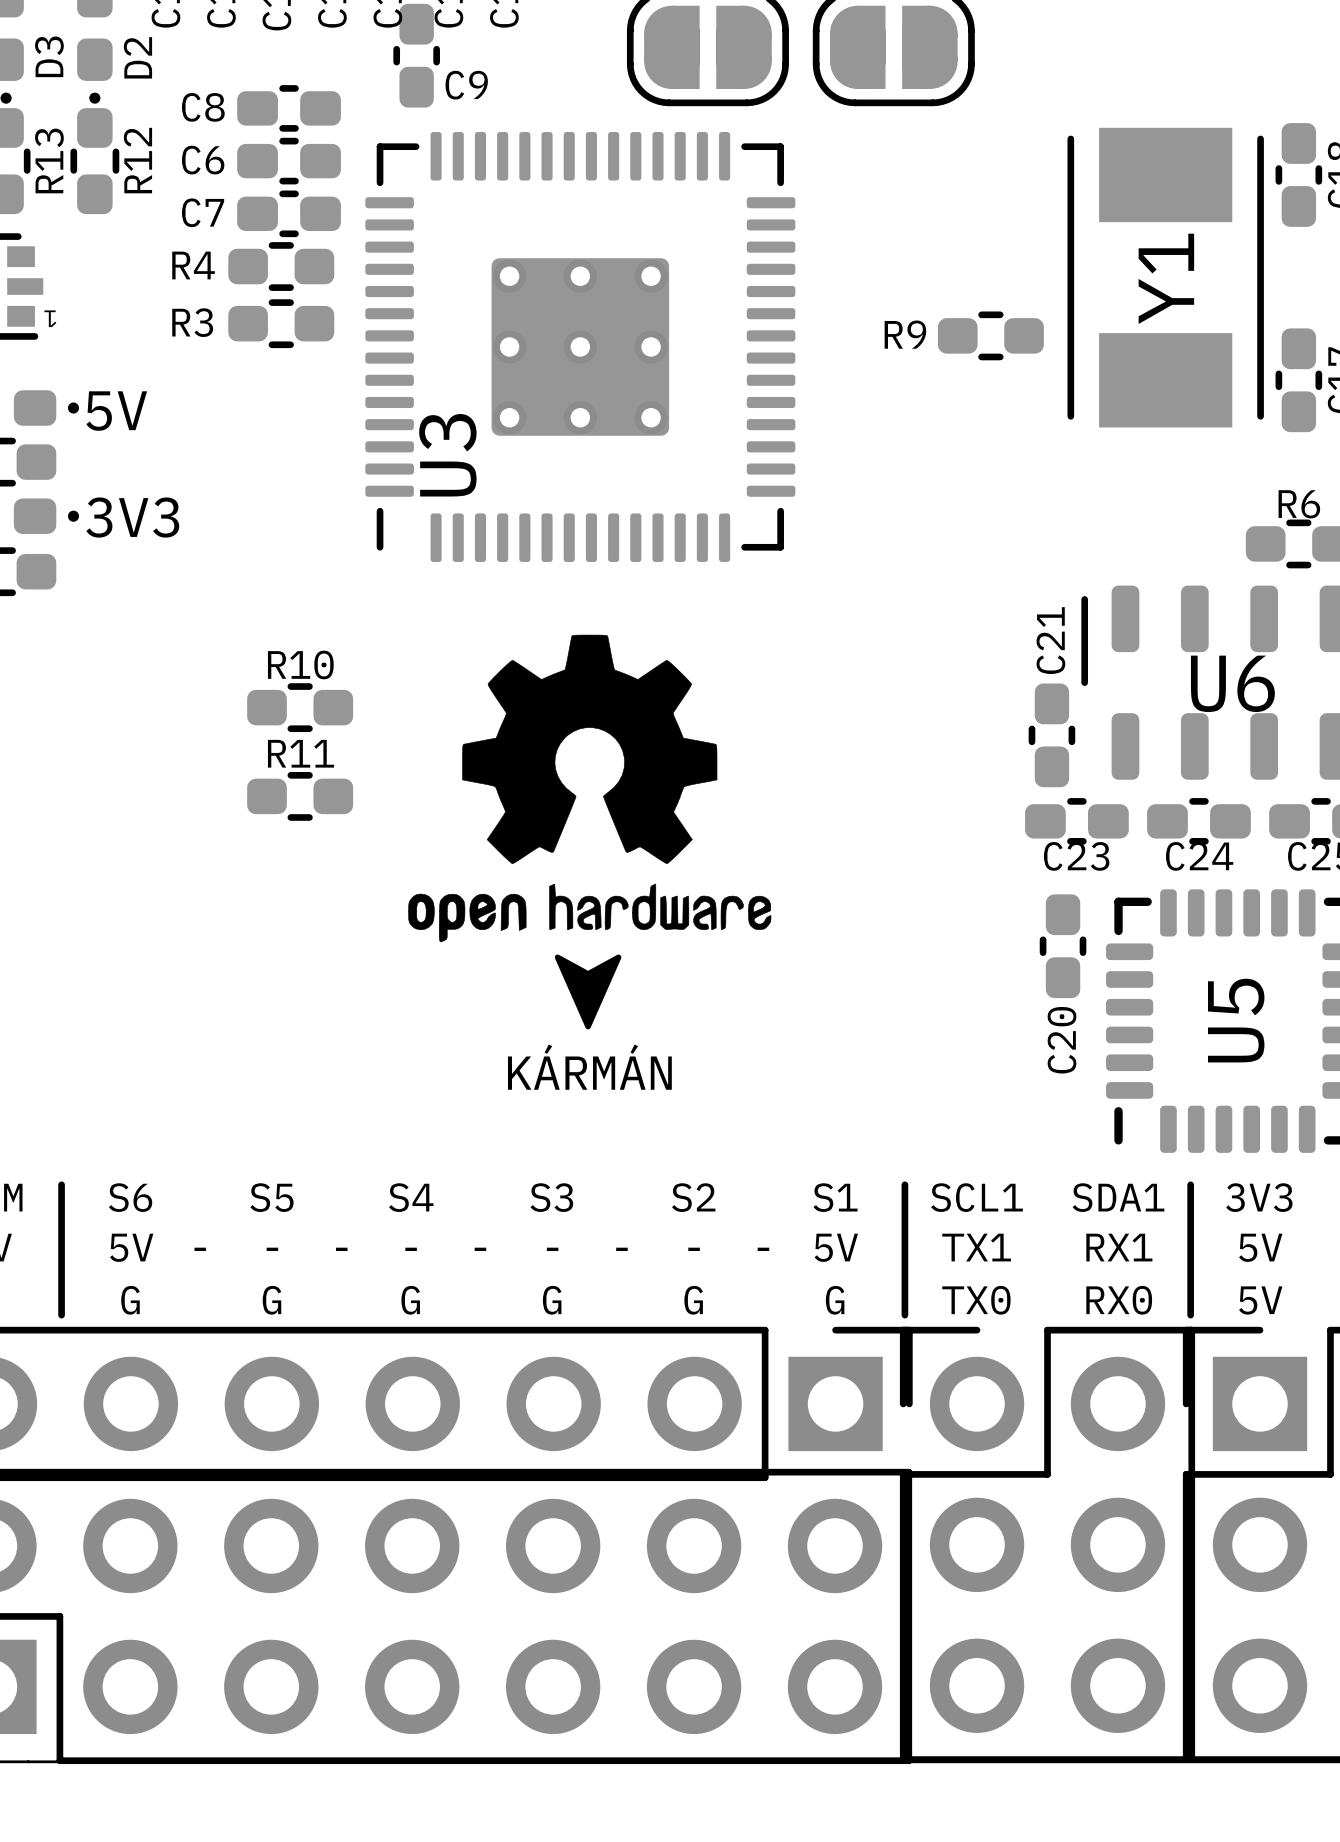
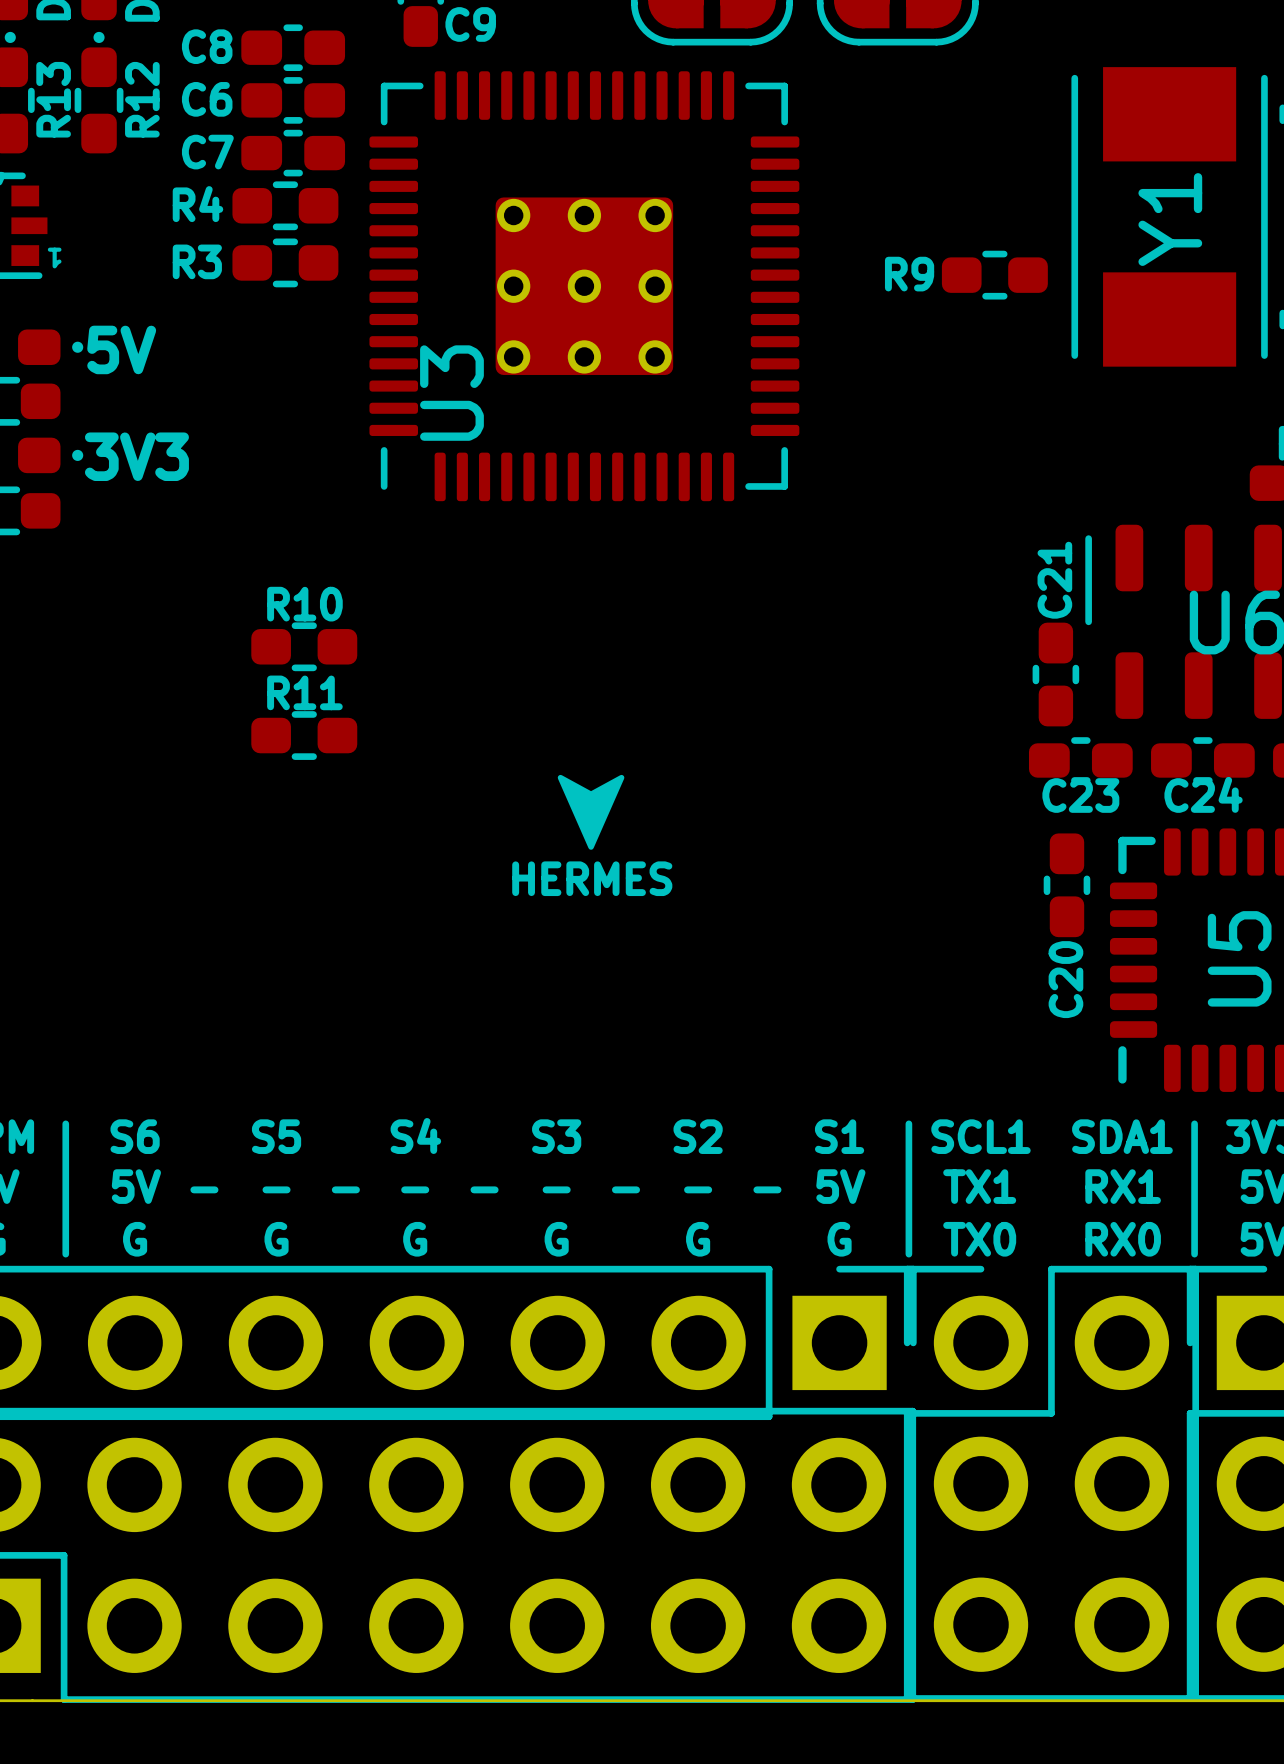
drawing: [408, 634, 772, 943] -> none
text: none -> HERMES (592, 878)
drawing position: (588, 991) -> (591, 812)
text: KÁRMÁN (589, 1067) -> none

